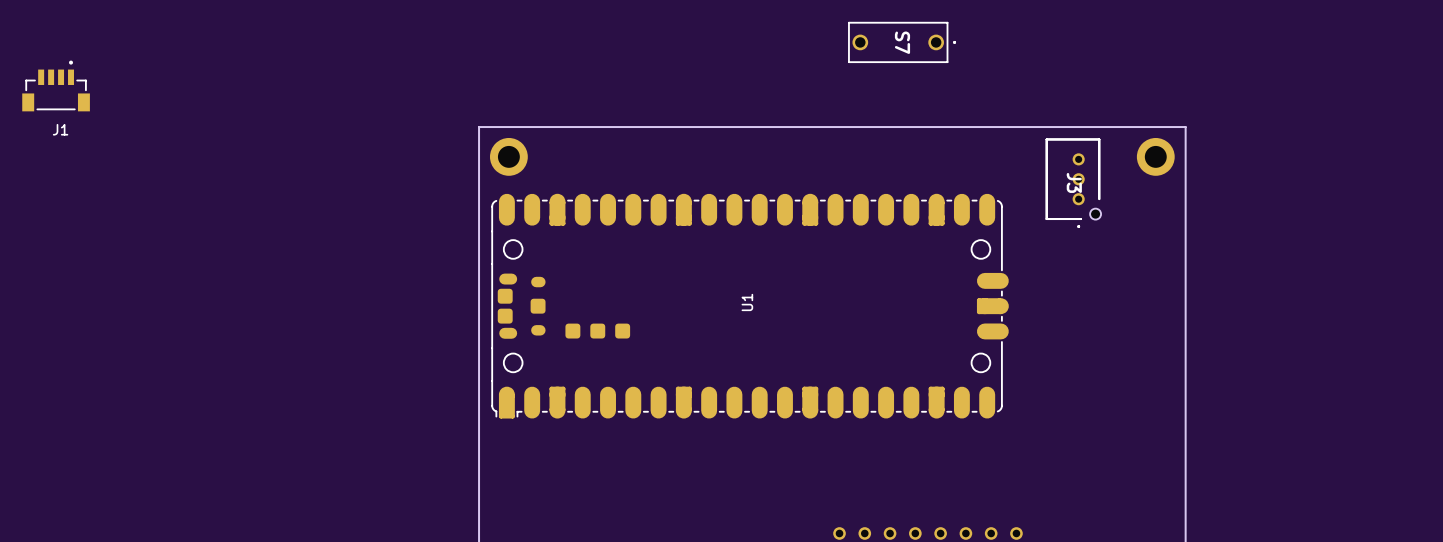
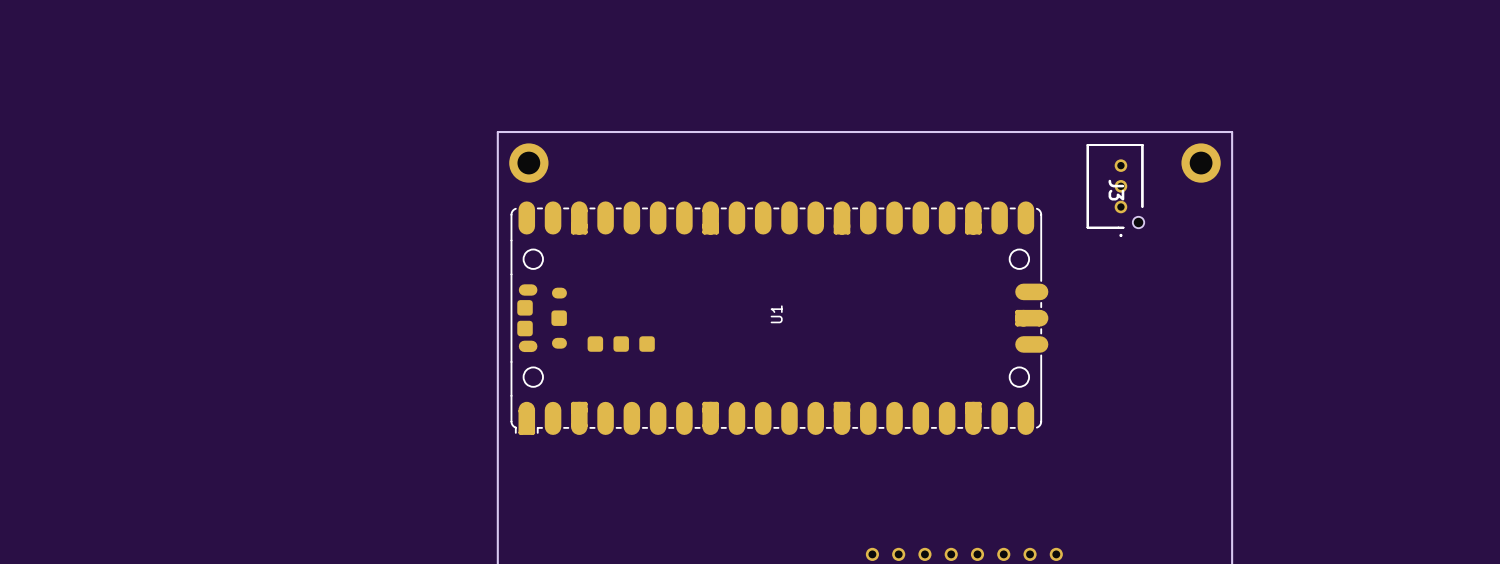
S7: (902, 42) -> none
J1: (56, 85) -> none

